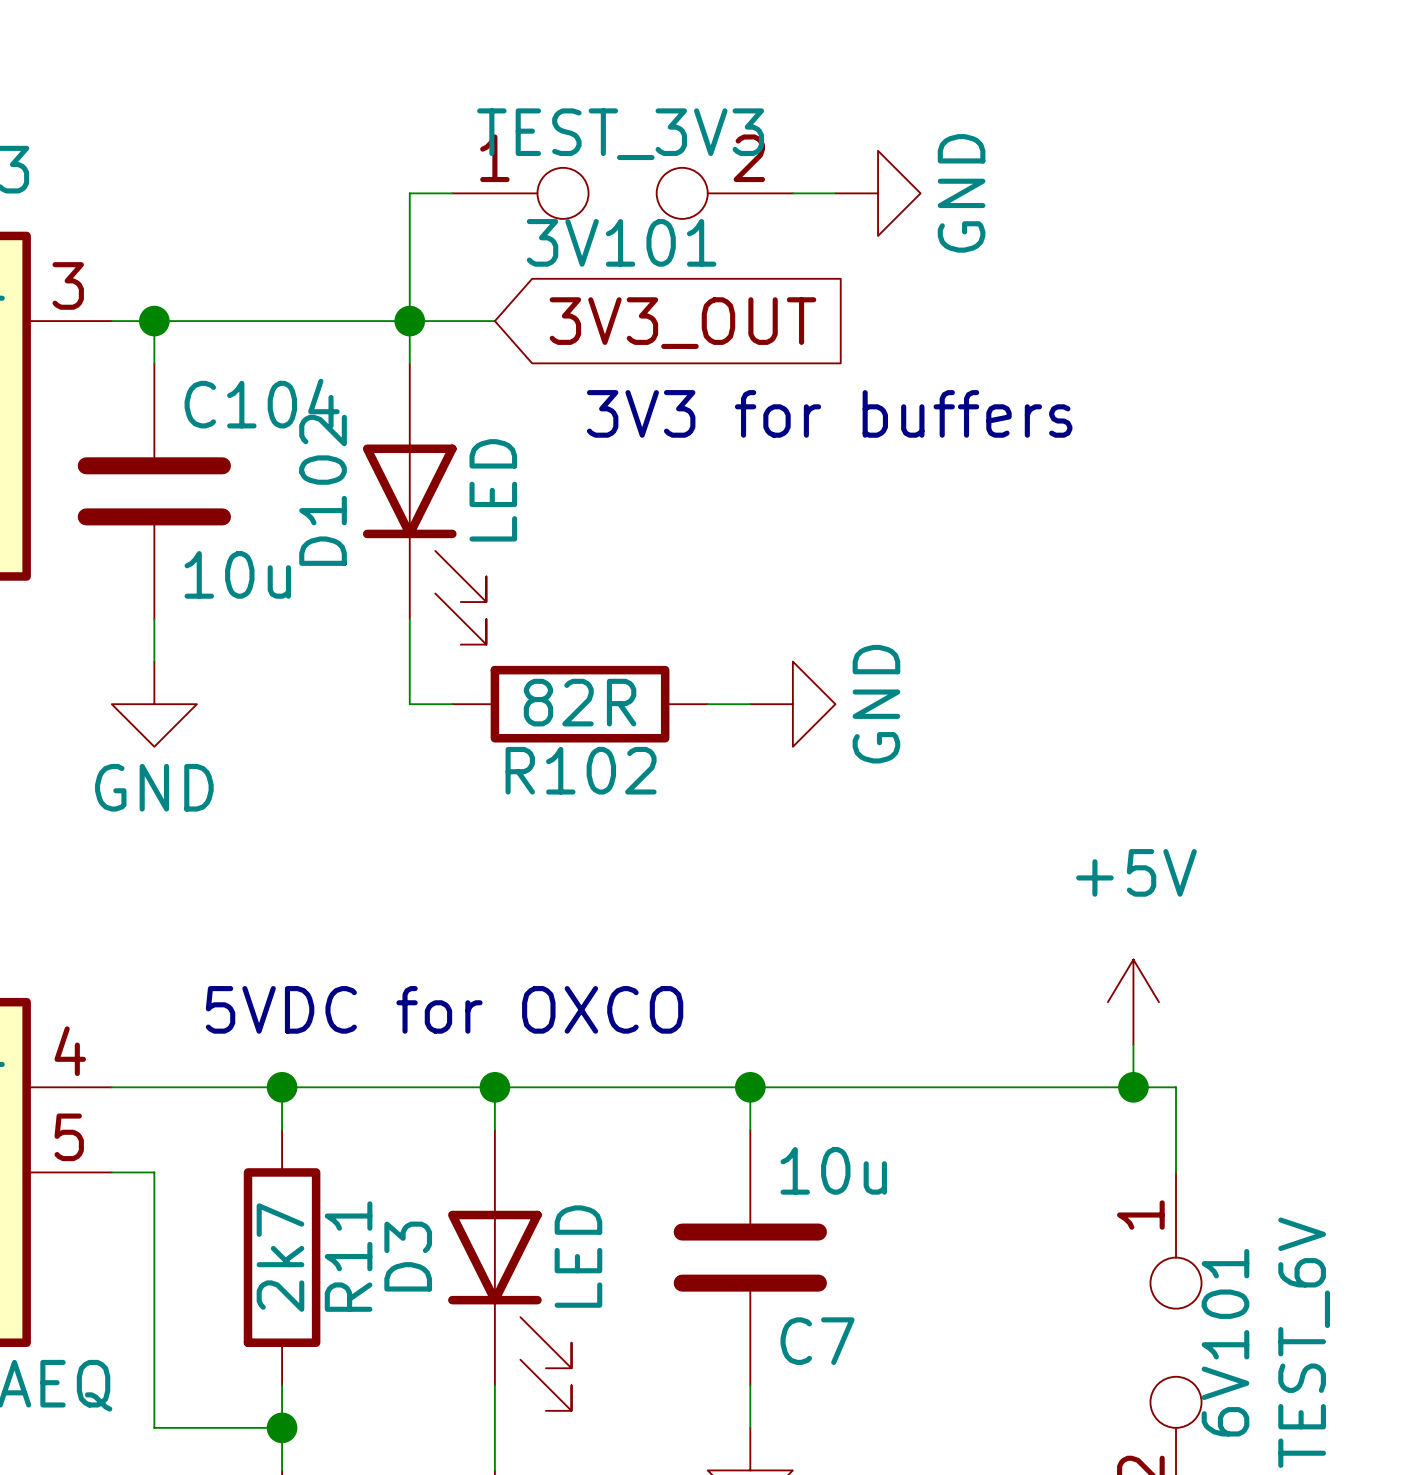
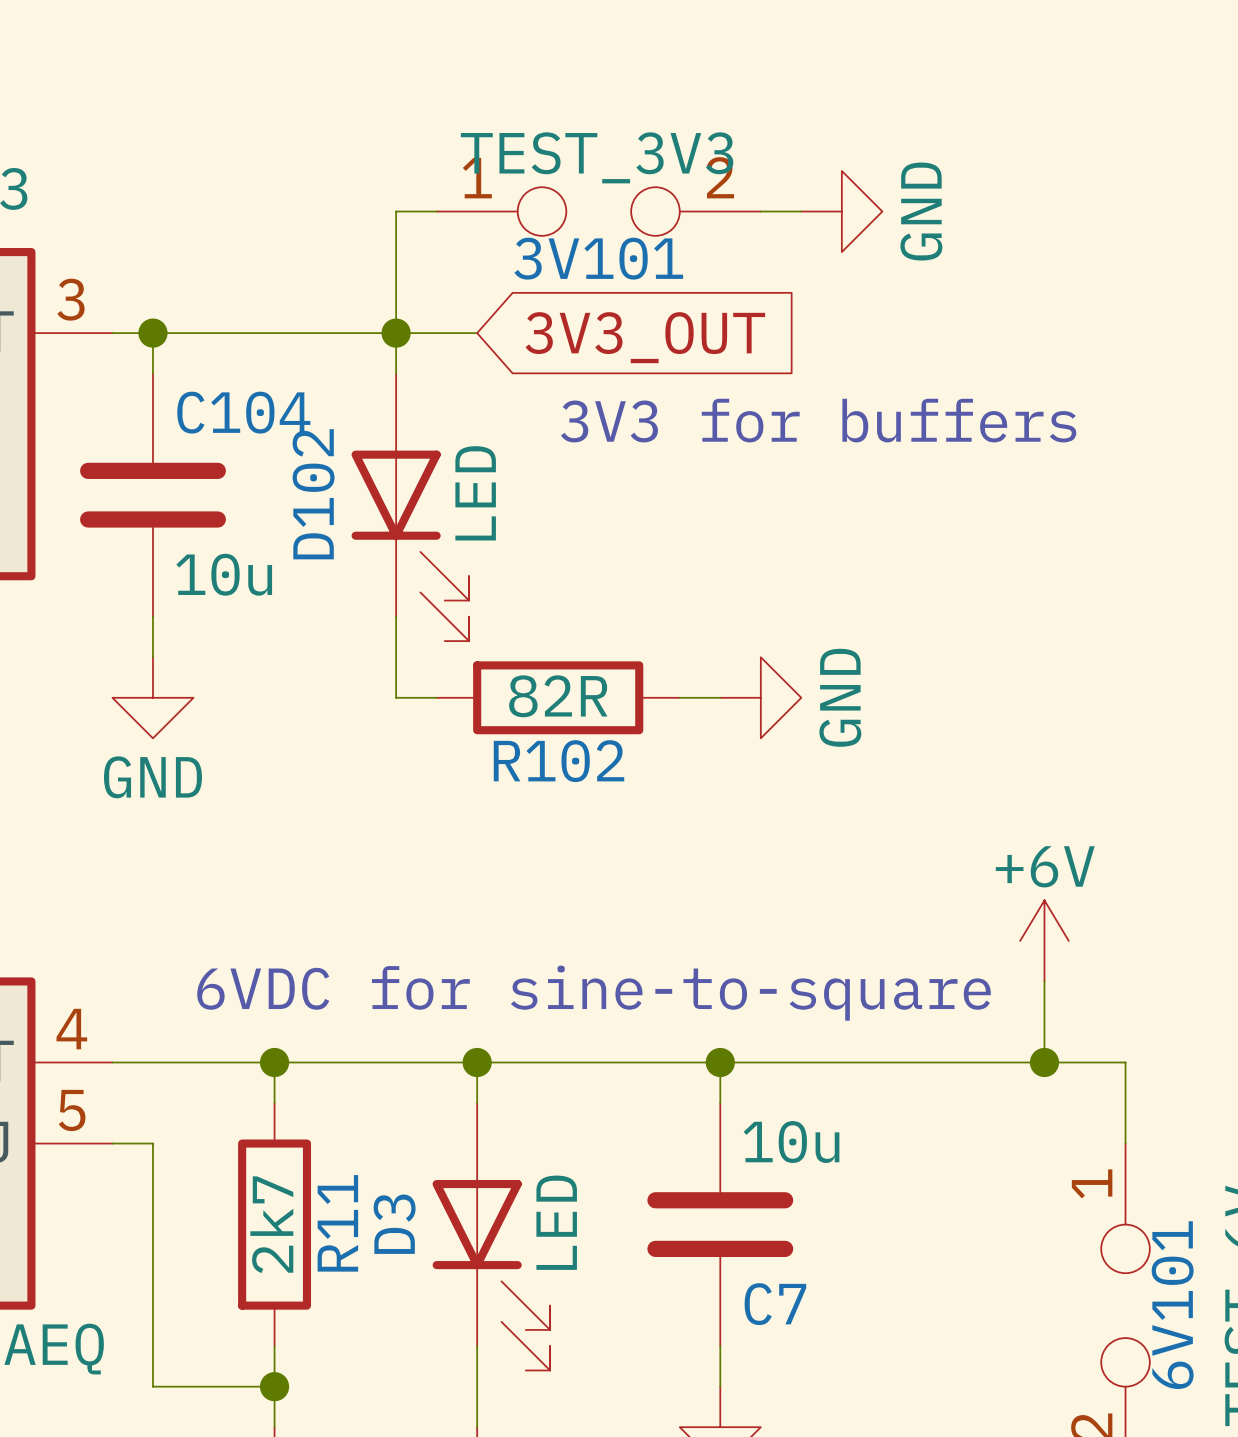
power symbol: none -> +6V (1044, 940)
wire: none -> (1044, 981) (1044, 1062)
power symbol: +5V (1133, 1002) -> none
text: 5VDC for OXCO (444, 1009) -> 6VDC for sine-to-square (594, 993)
wire: (1133, 1044) (1133, 1087) -> none
junction position: (1133, 1087) -> (1044, 1062)

